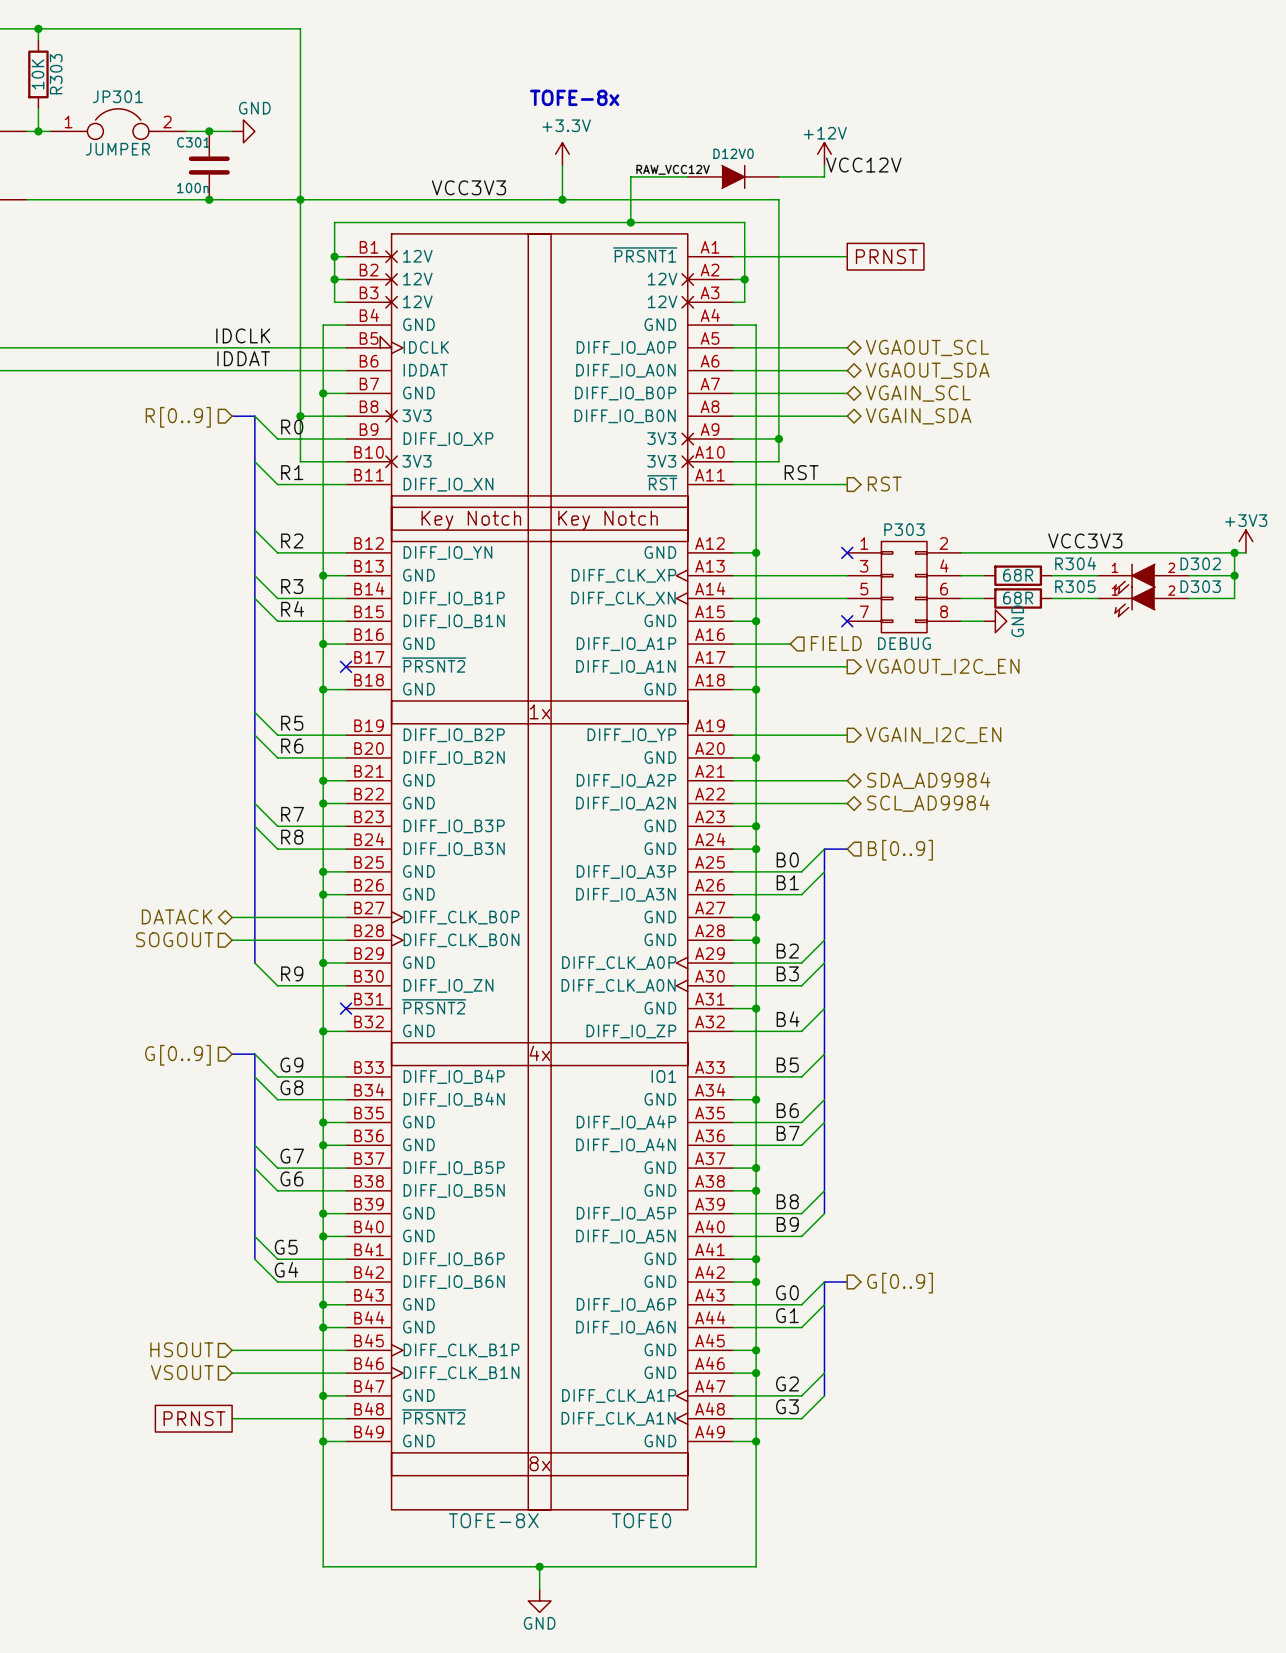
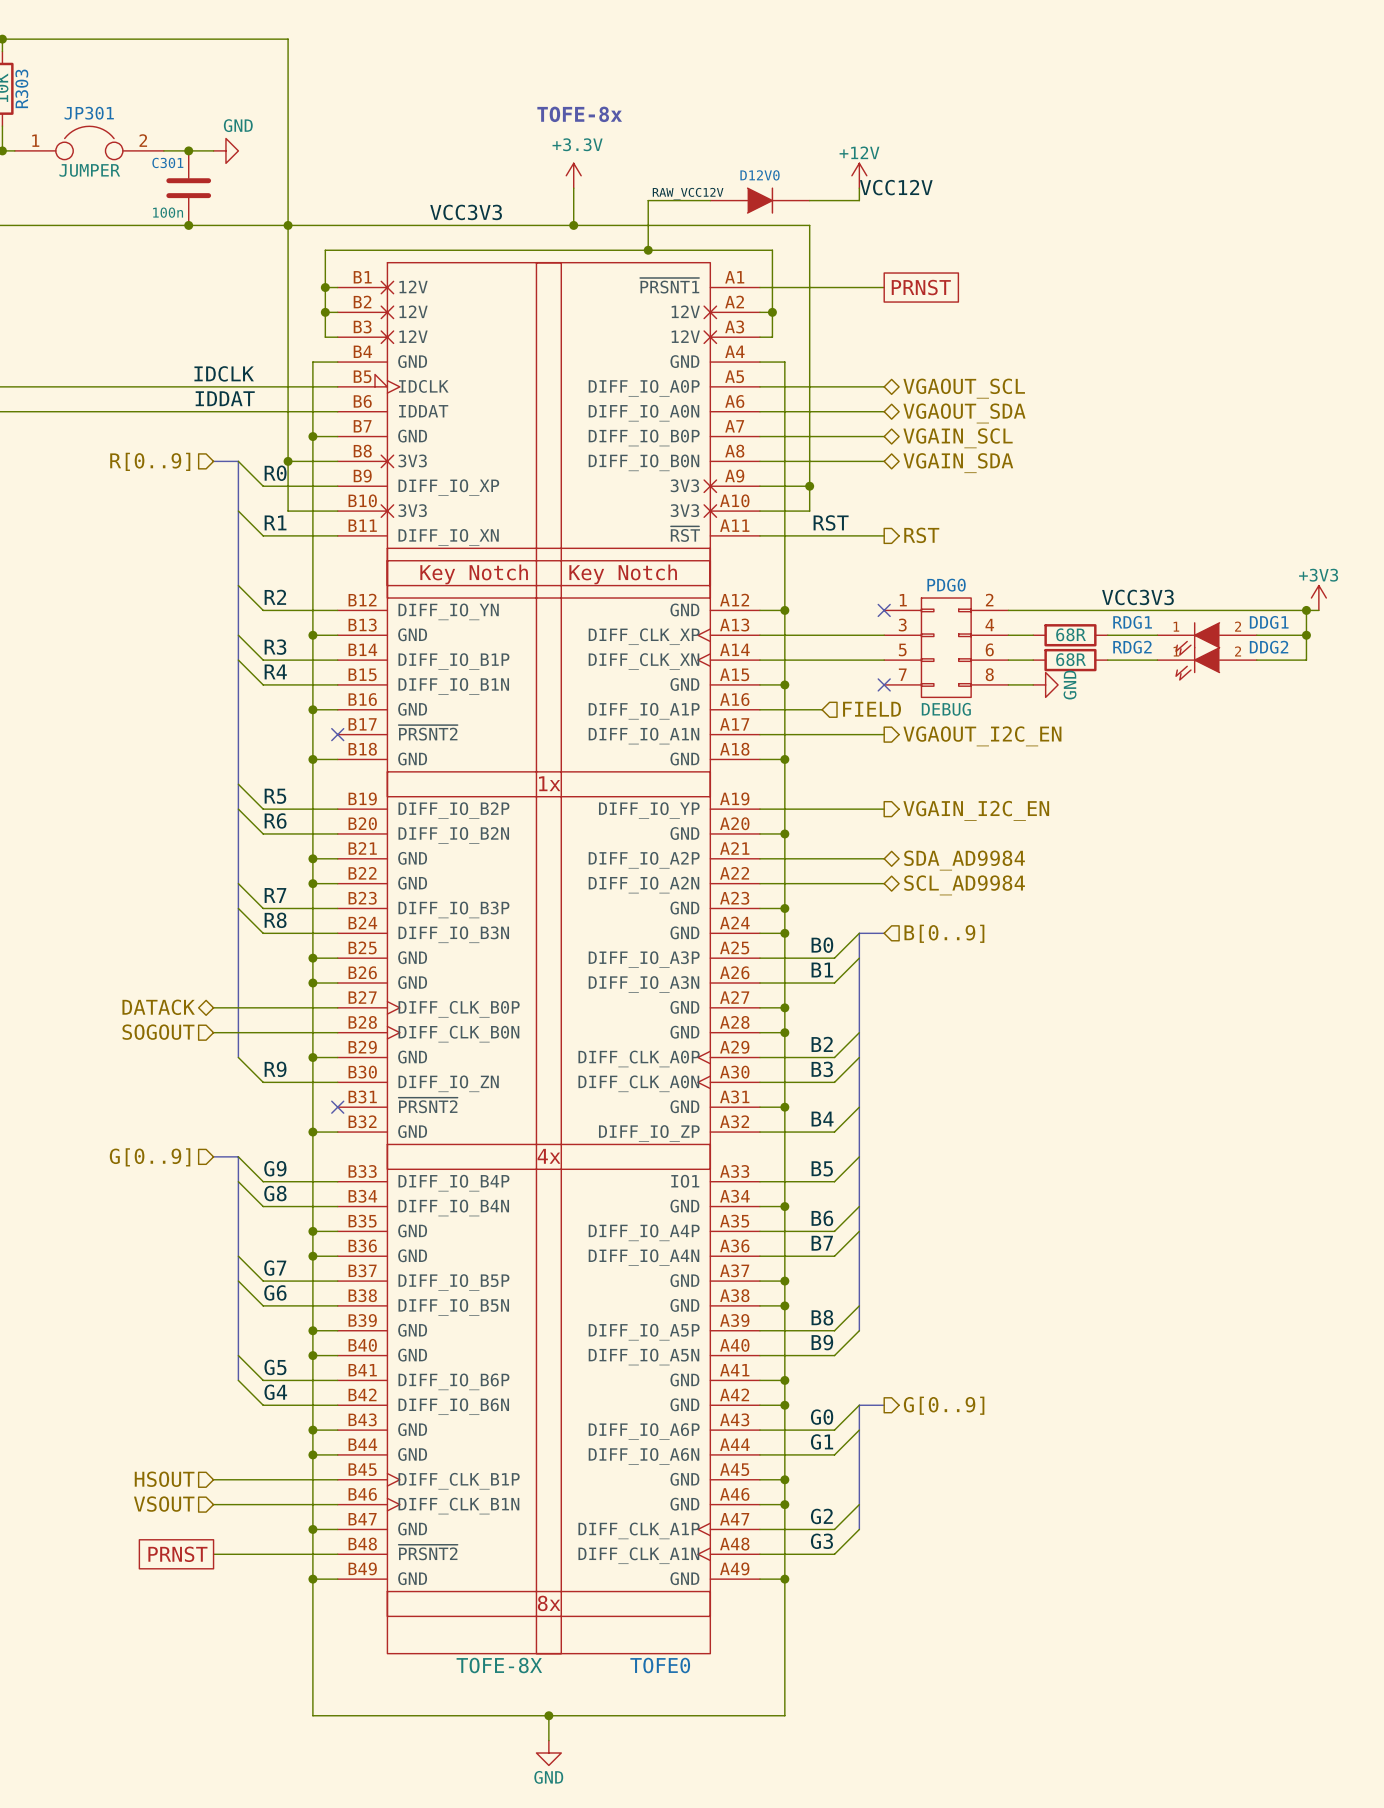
P303 name: P303 (904, 529) -> PDG0 (946, 585)
R304 name: R304 (1075, 563) -> RDG1 (1132, 622)
D302 name: D302 (1200, 563) -> DDG1 (1269, 622)
R305 name: R305 (1075, 586) -> RDG2 (1132, 647)
D303 name: D303 (1200, 586) -> DDG2 (1269, 647)

